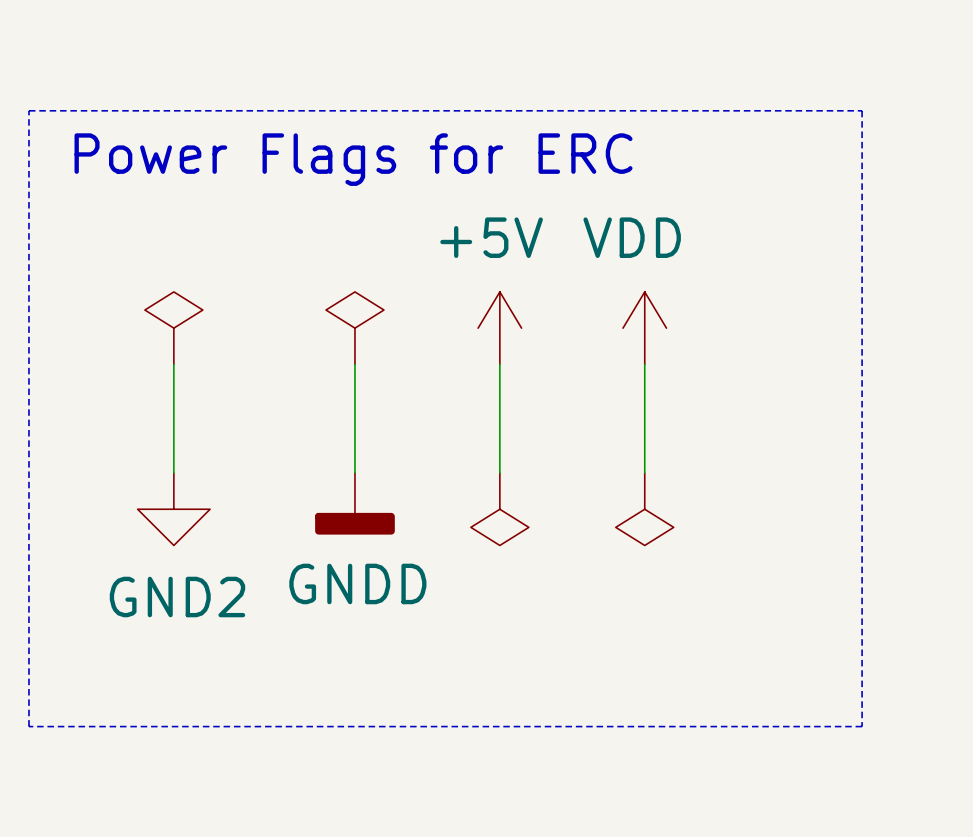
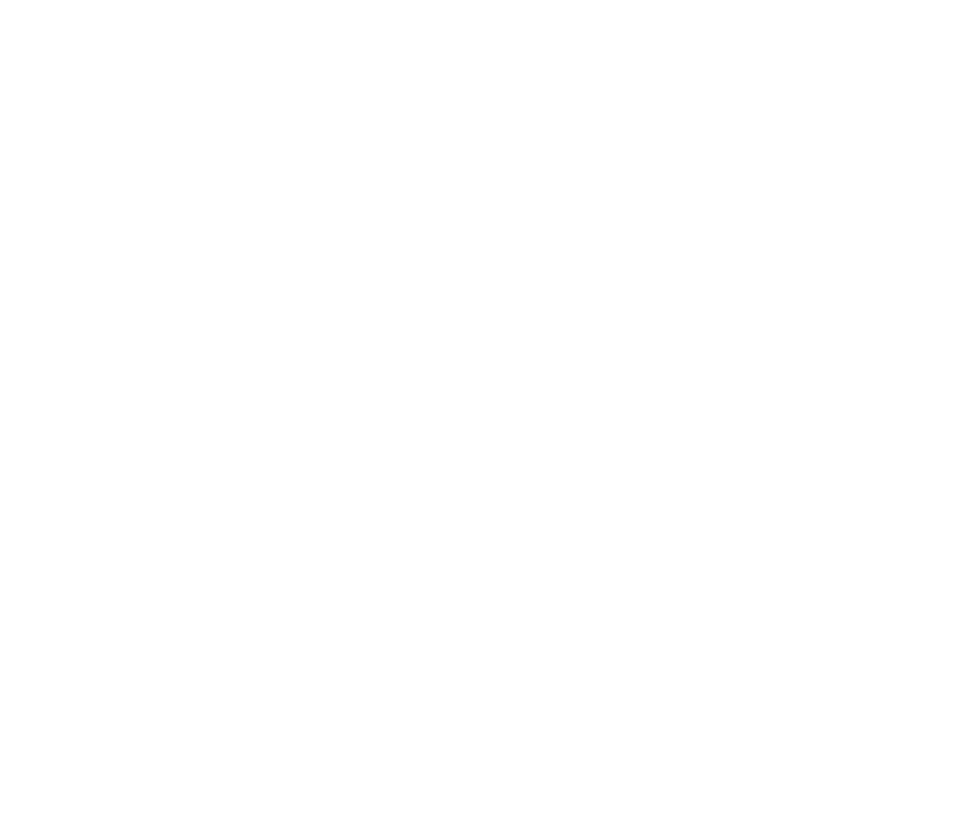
line: (28, 110) (862, 110) (862, 726) (28, 726) (28, 110) -> none
text: Power Flags for ERC (353, 159) -> none
power symbol: (173, 328) -> none
power symbol: (354, 328) -> none
power symbol: +5V (499, 328) -> none
power symbol: VDD (644, 328) -> none
wire: (173, 364) (173, 473) -> none
wire: (354, 364) (354, 473) -> none
wire: (499, 364) (499, 473) -> none
wire: (644, 364) (644, 473) -> none
power symbol: GNDD (354, 503) -> none
power symbol: GND2 (173, 509) -> none
power symbol: (499, 509) -> none
power symbol: (644, 509) -> none

